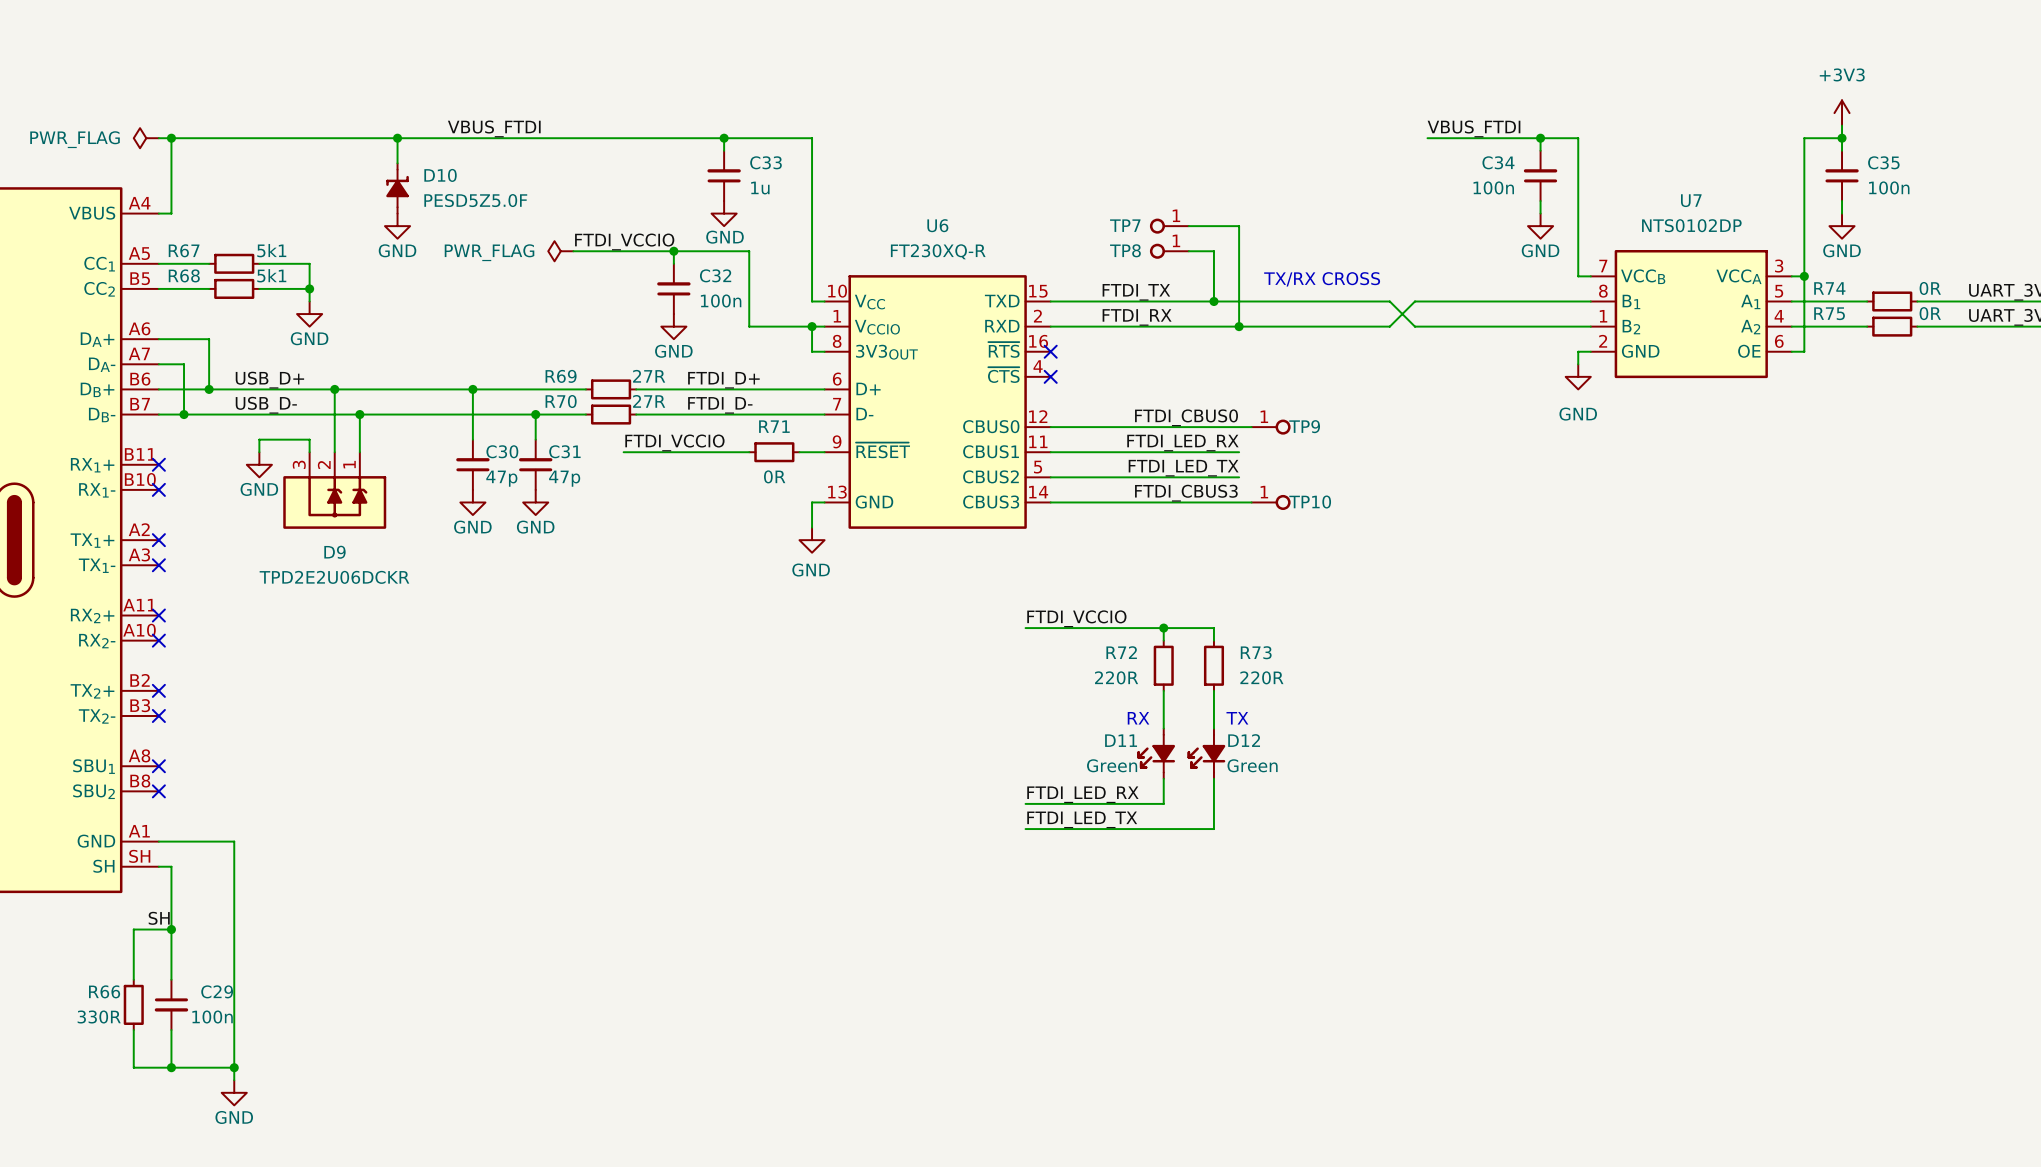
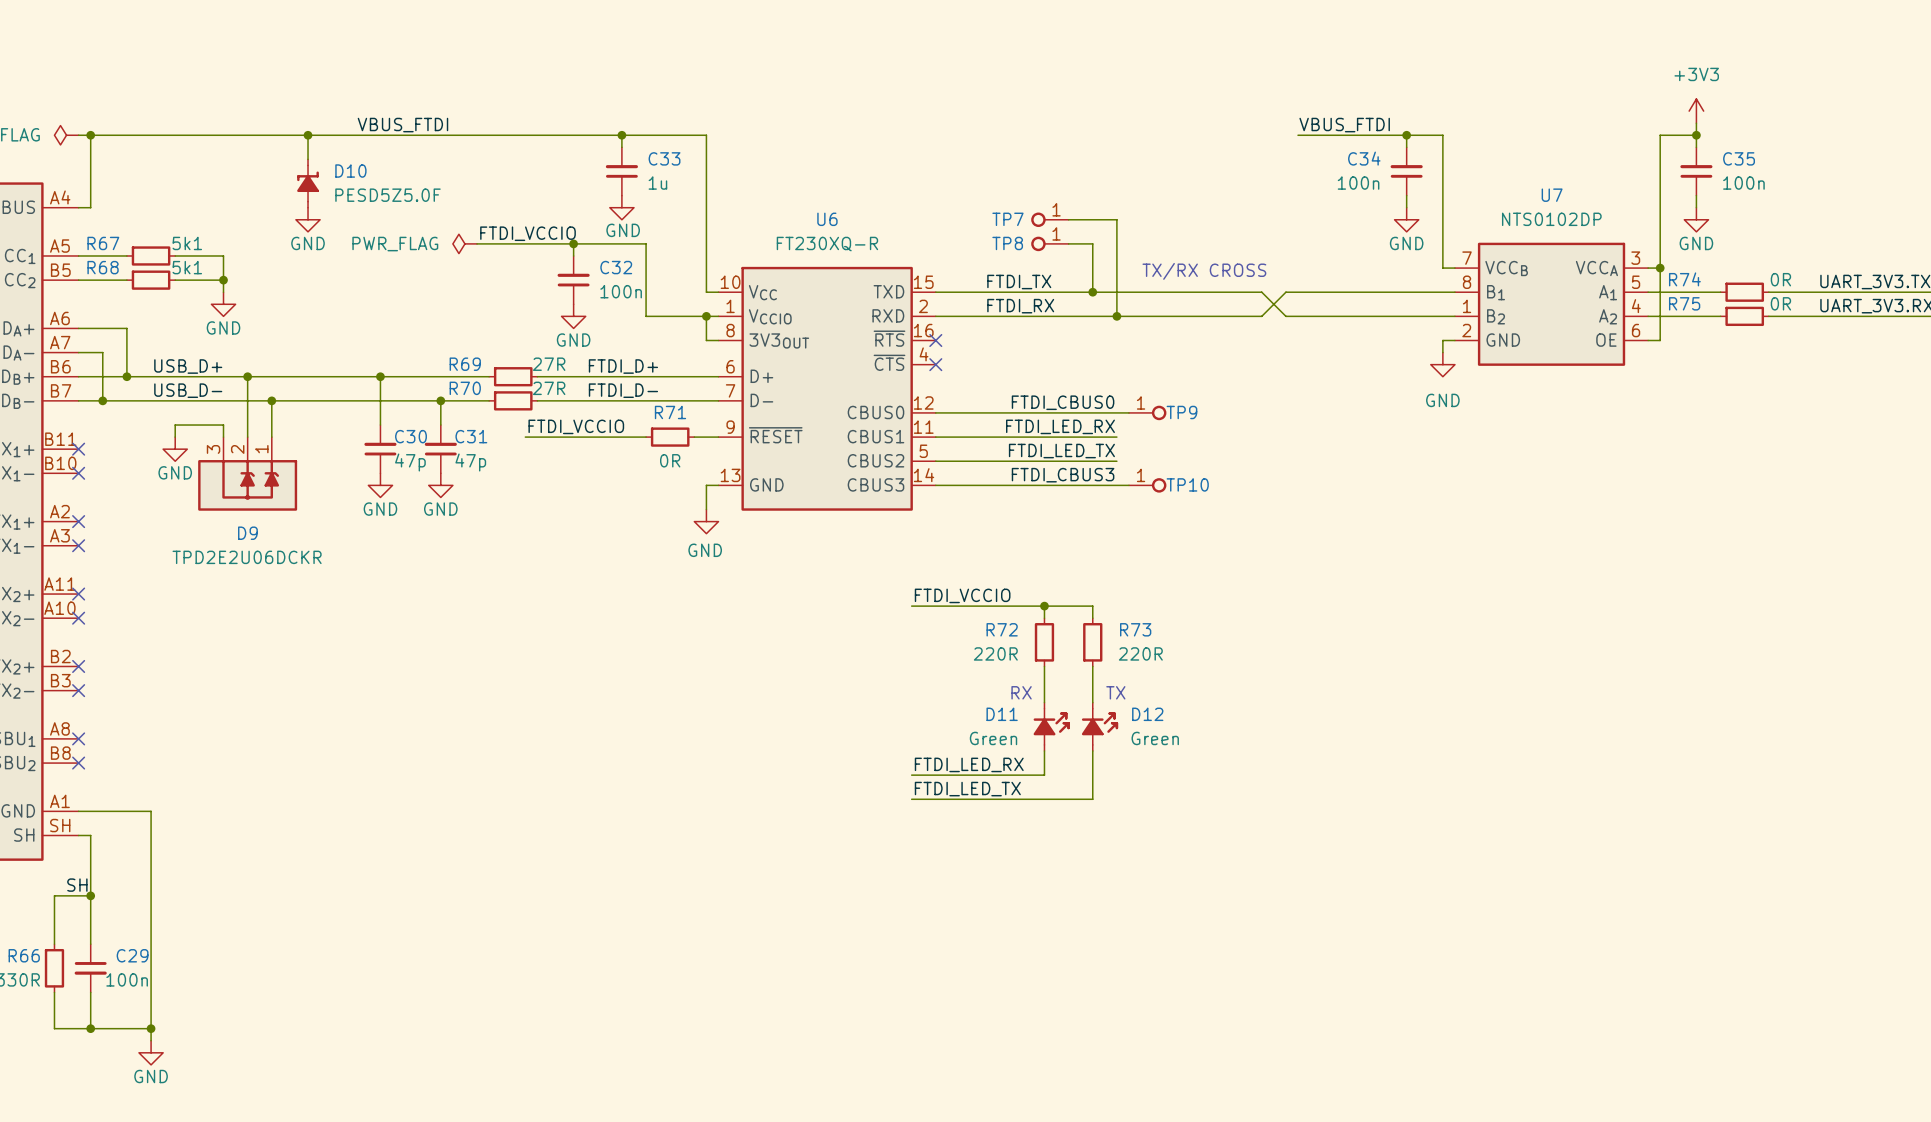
D11 rotation: 0° (1156, 753) -> 180° (1051, 726)
D12 rotation: 0° (1206, 753) -> 180° (1100, 726)

